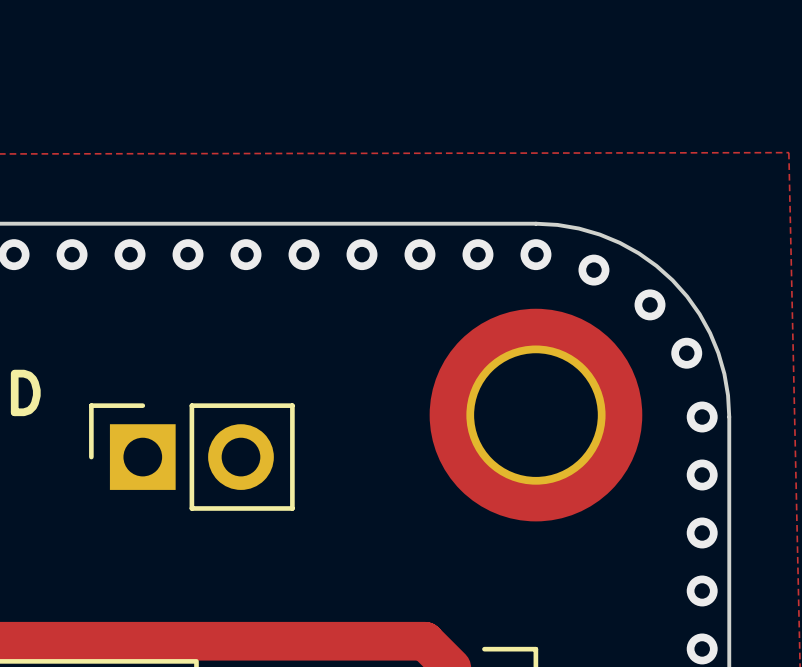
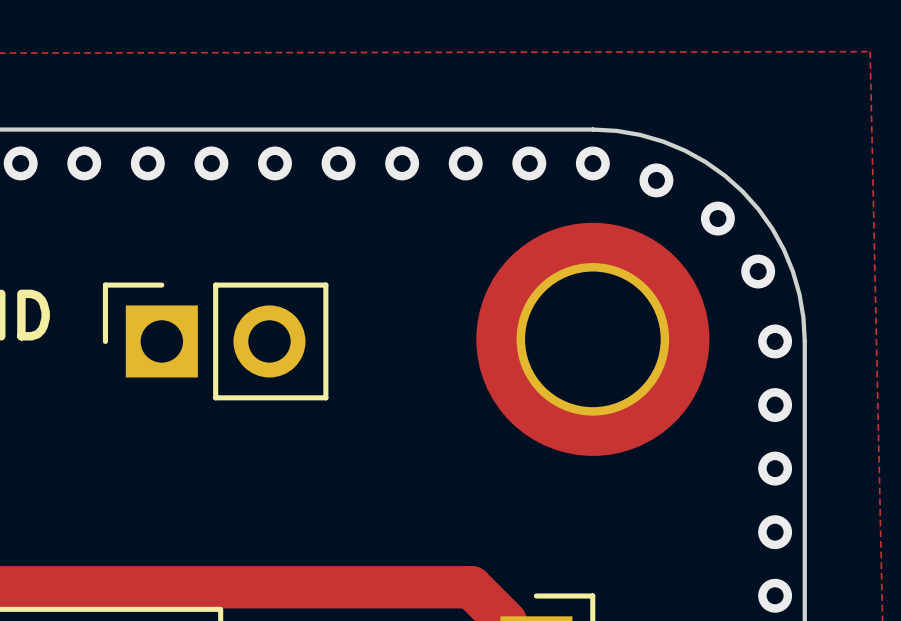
part position: (191, 457) -> (215, 341)

